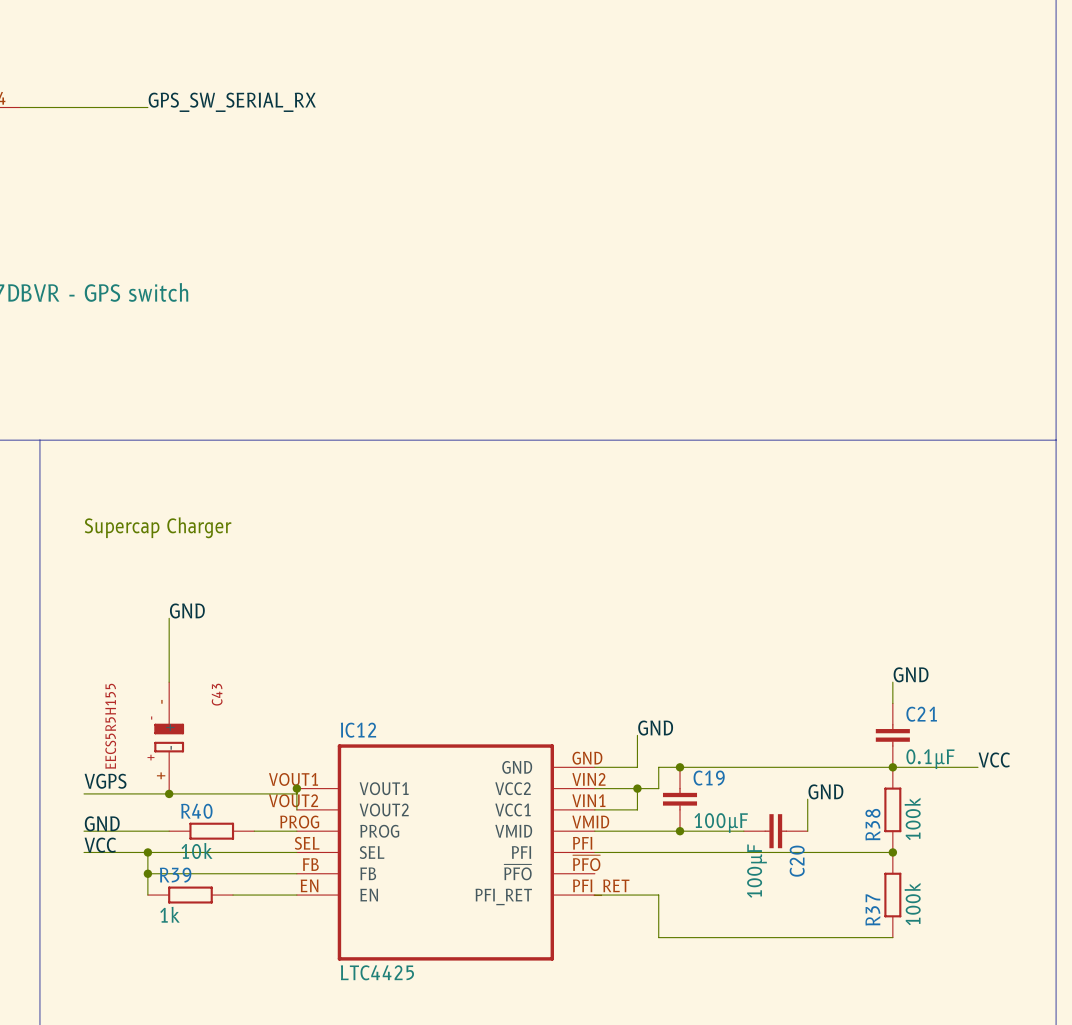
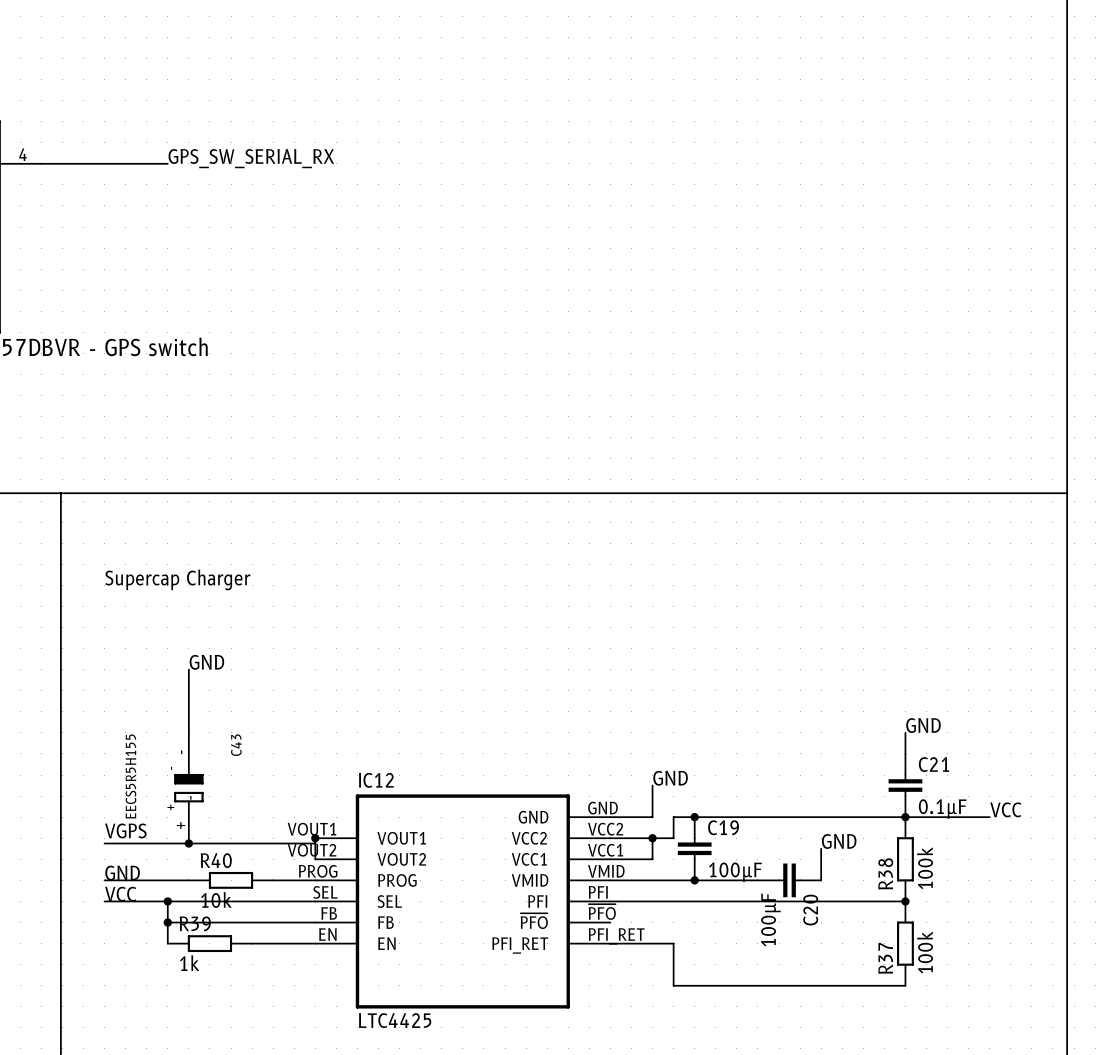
IC12 pin number: VIN2 (588, 779) -> VCC2 (605, 829)
IC12 pin number: VIN1 (588, 800) -> VCC1 (605, 850)

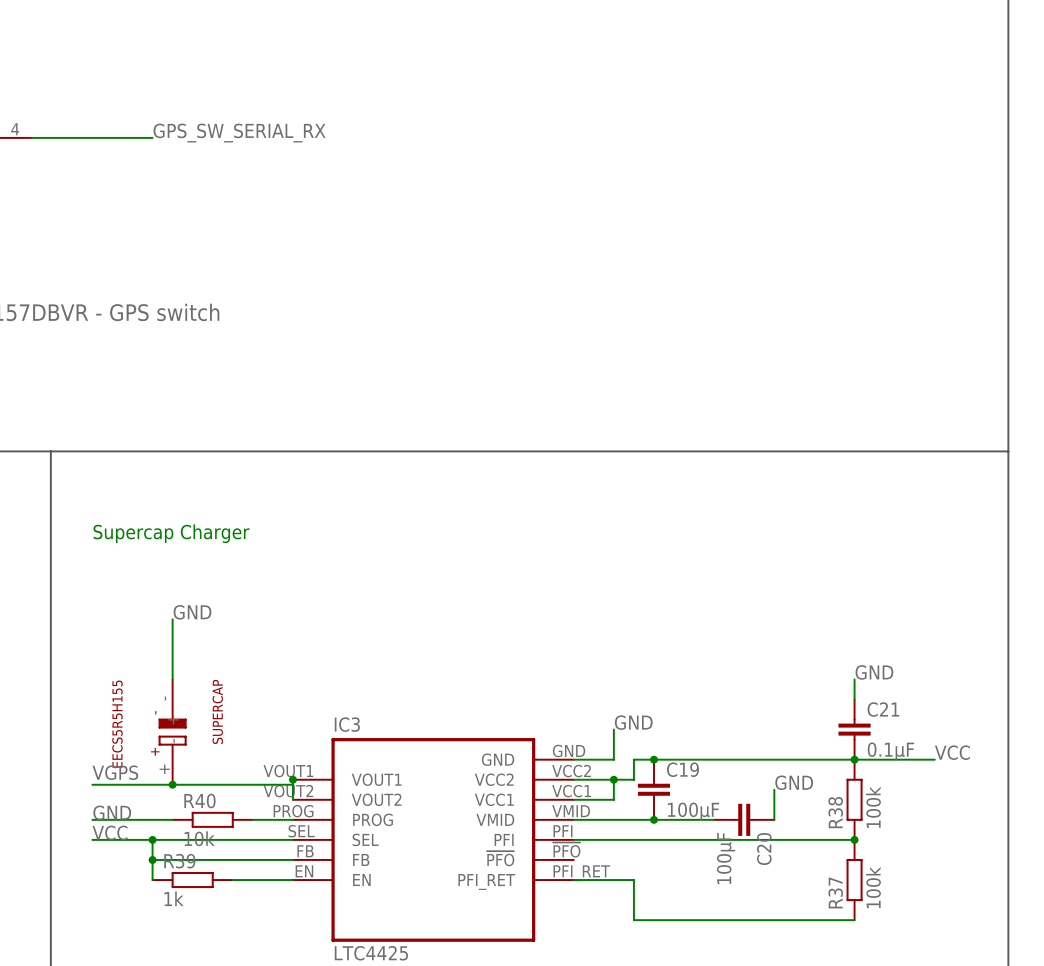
C43 name: C43 (236, 745) -> SUPERCAP (217, 711)
IC12 name: IC12 (376, 780) -> IC3 (347, 724)

